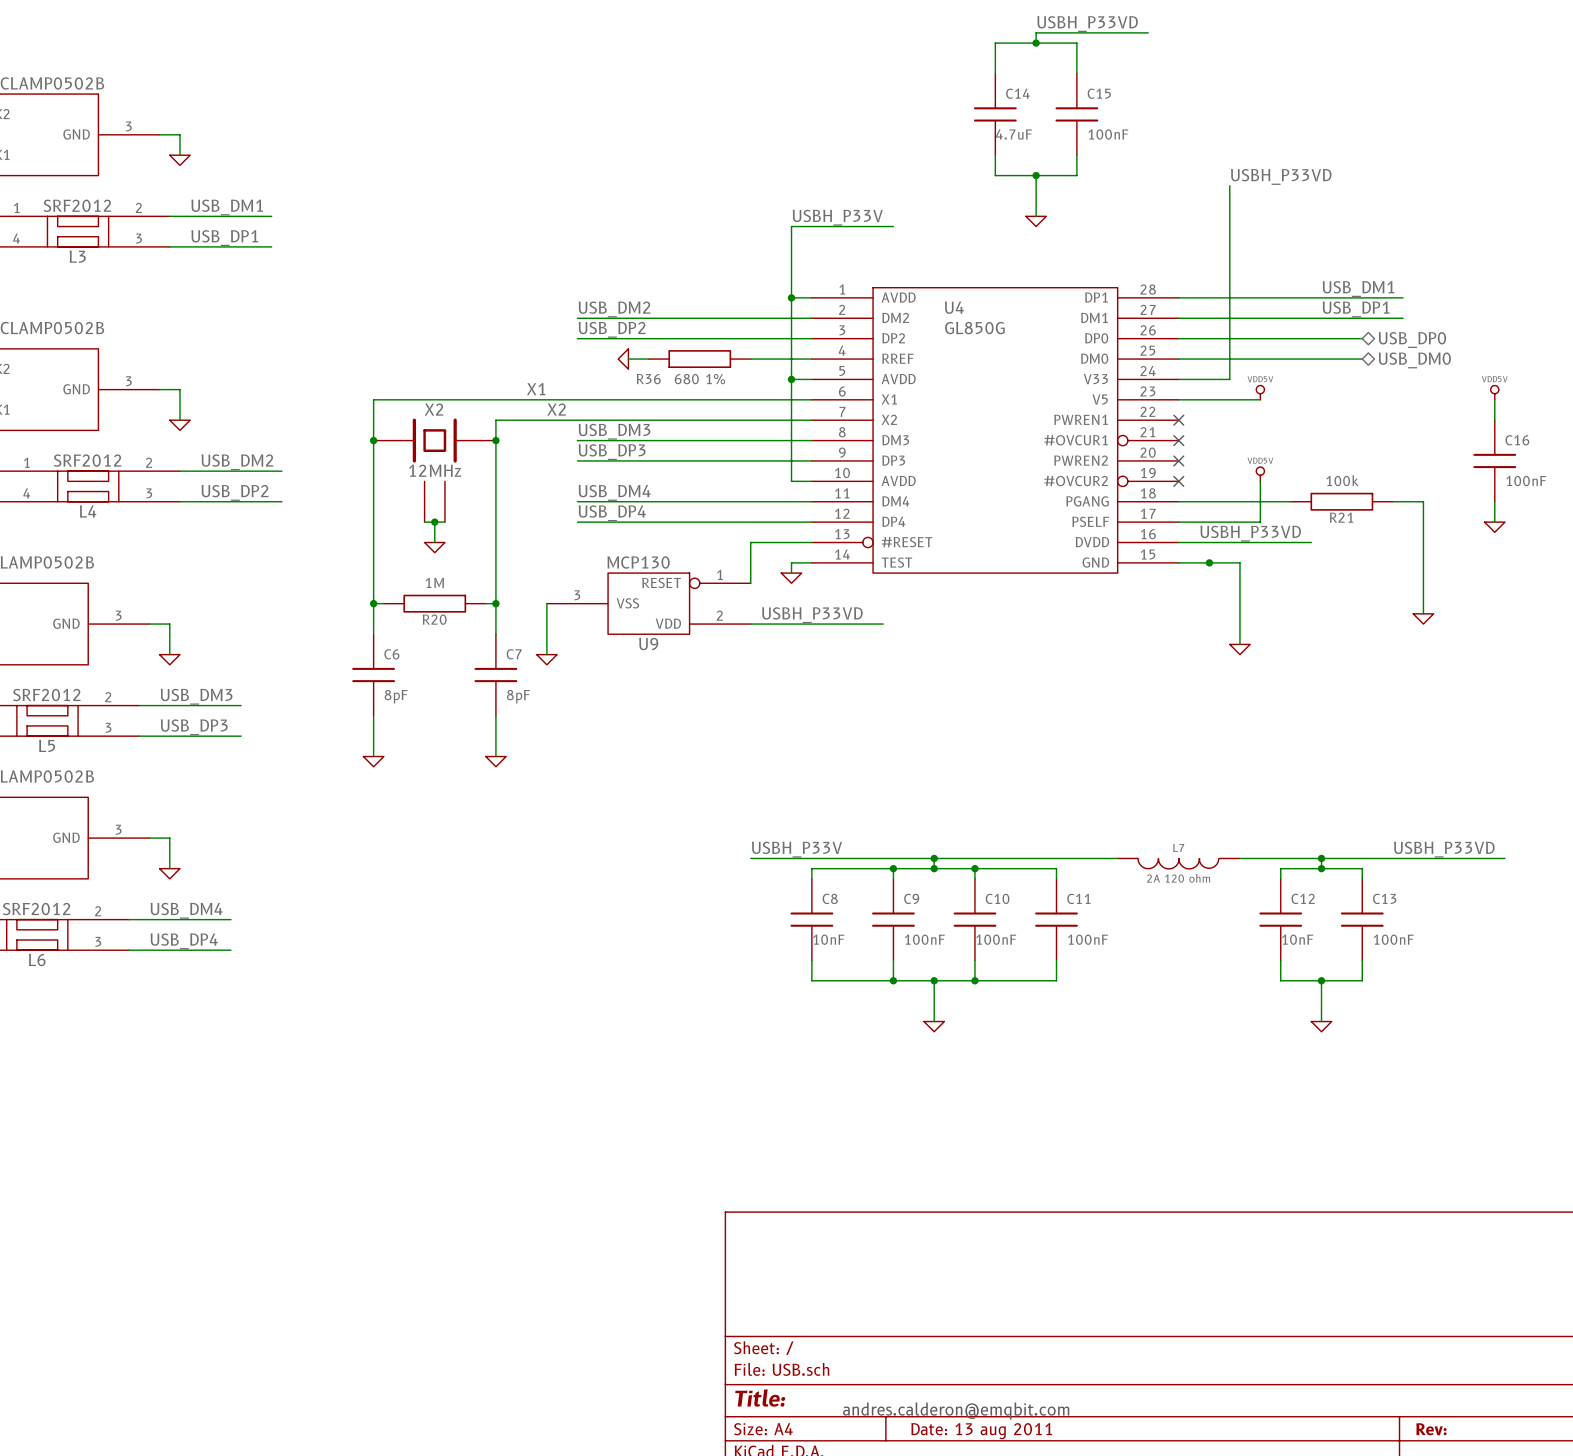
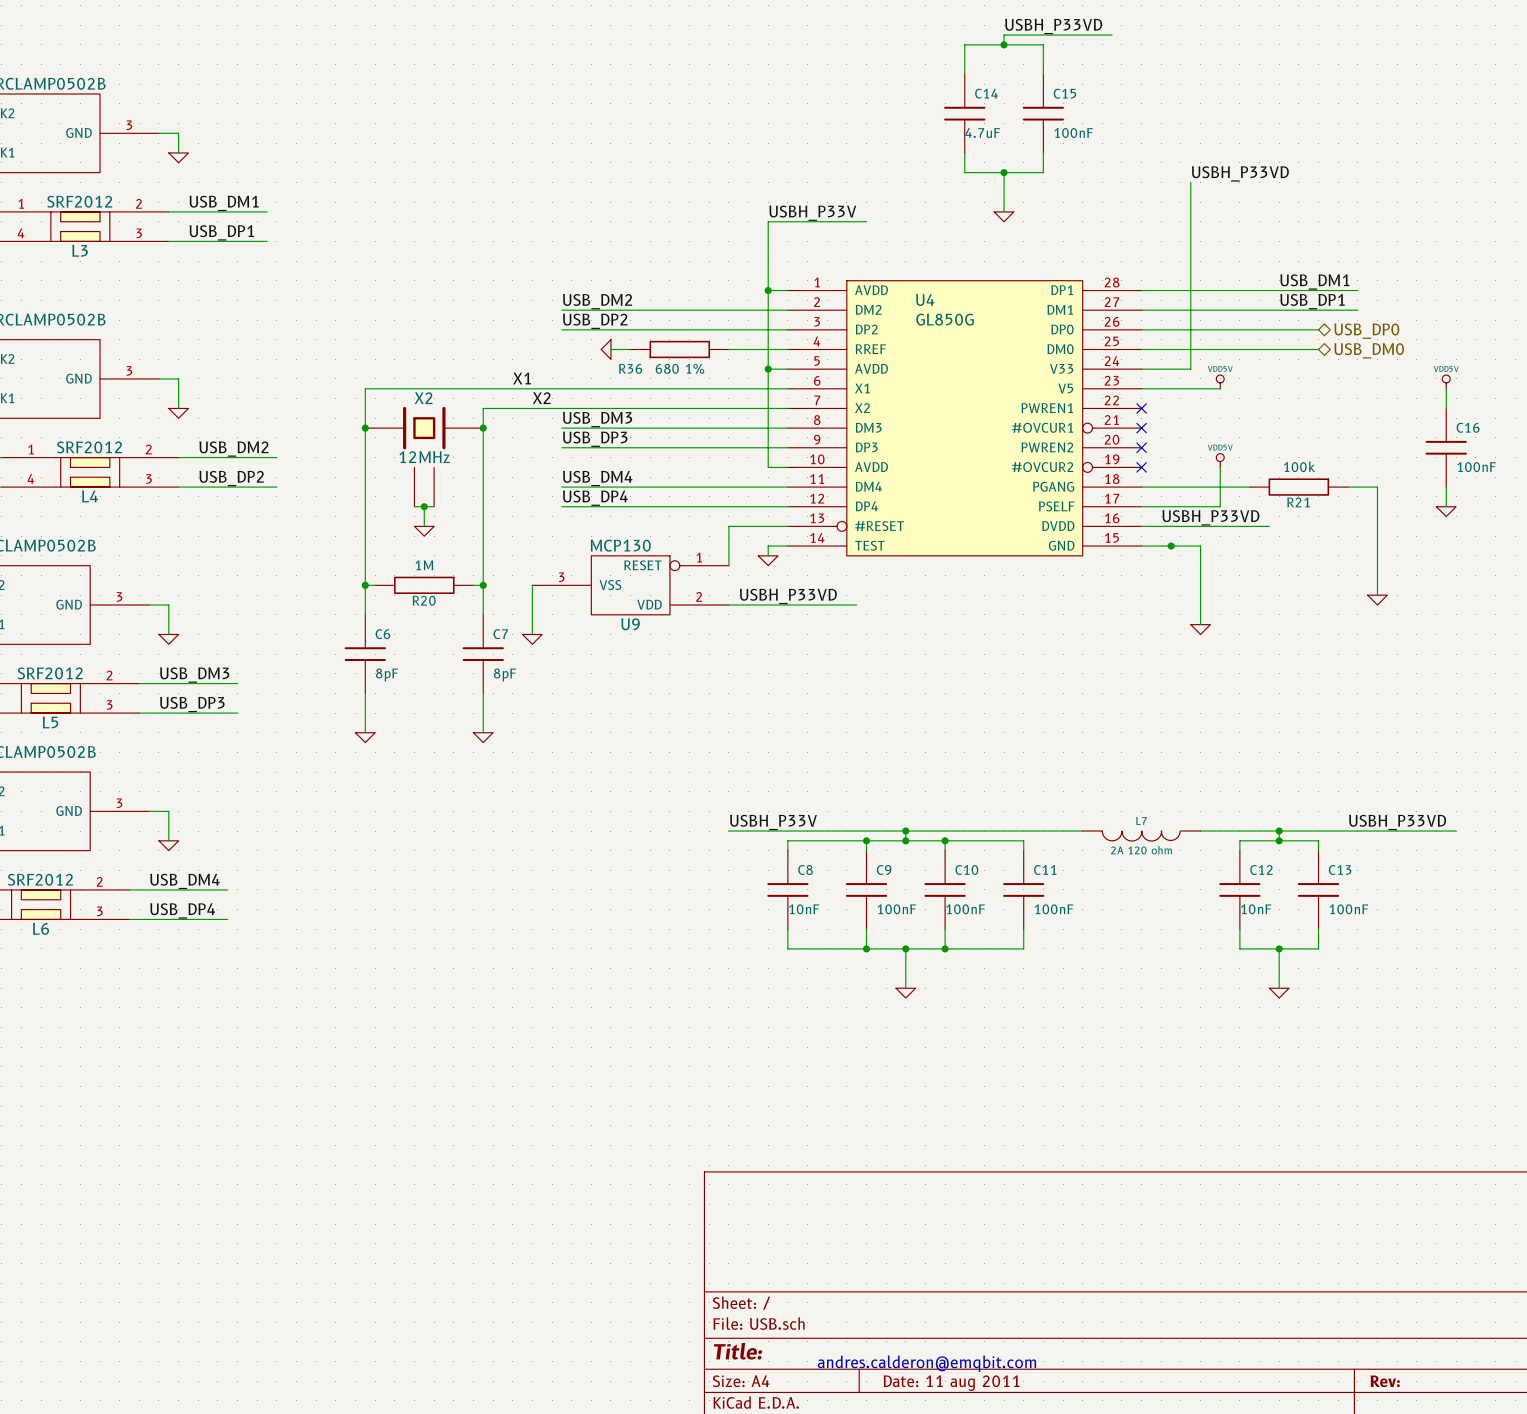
title block: Date: 13 aug 2011 (981, 1431) -> Date: 11 aug 2011 (951, 1383)

